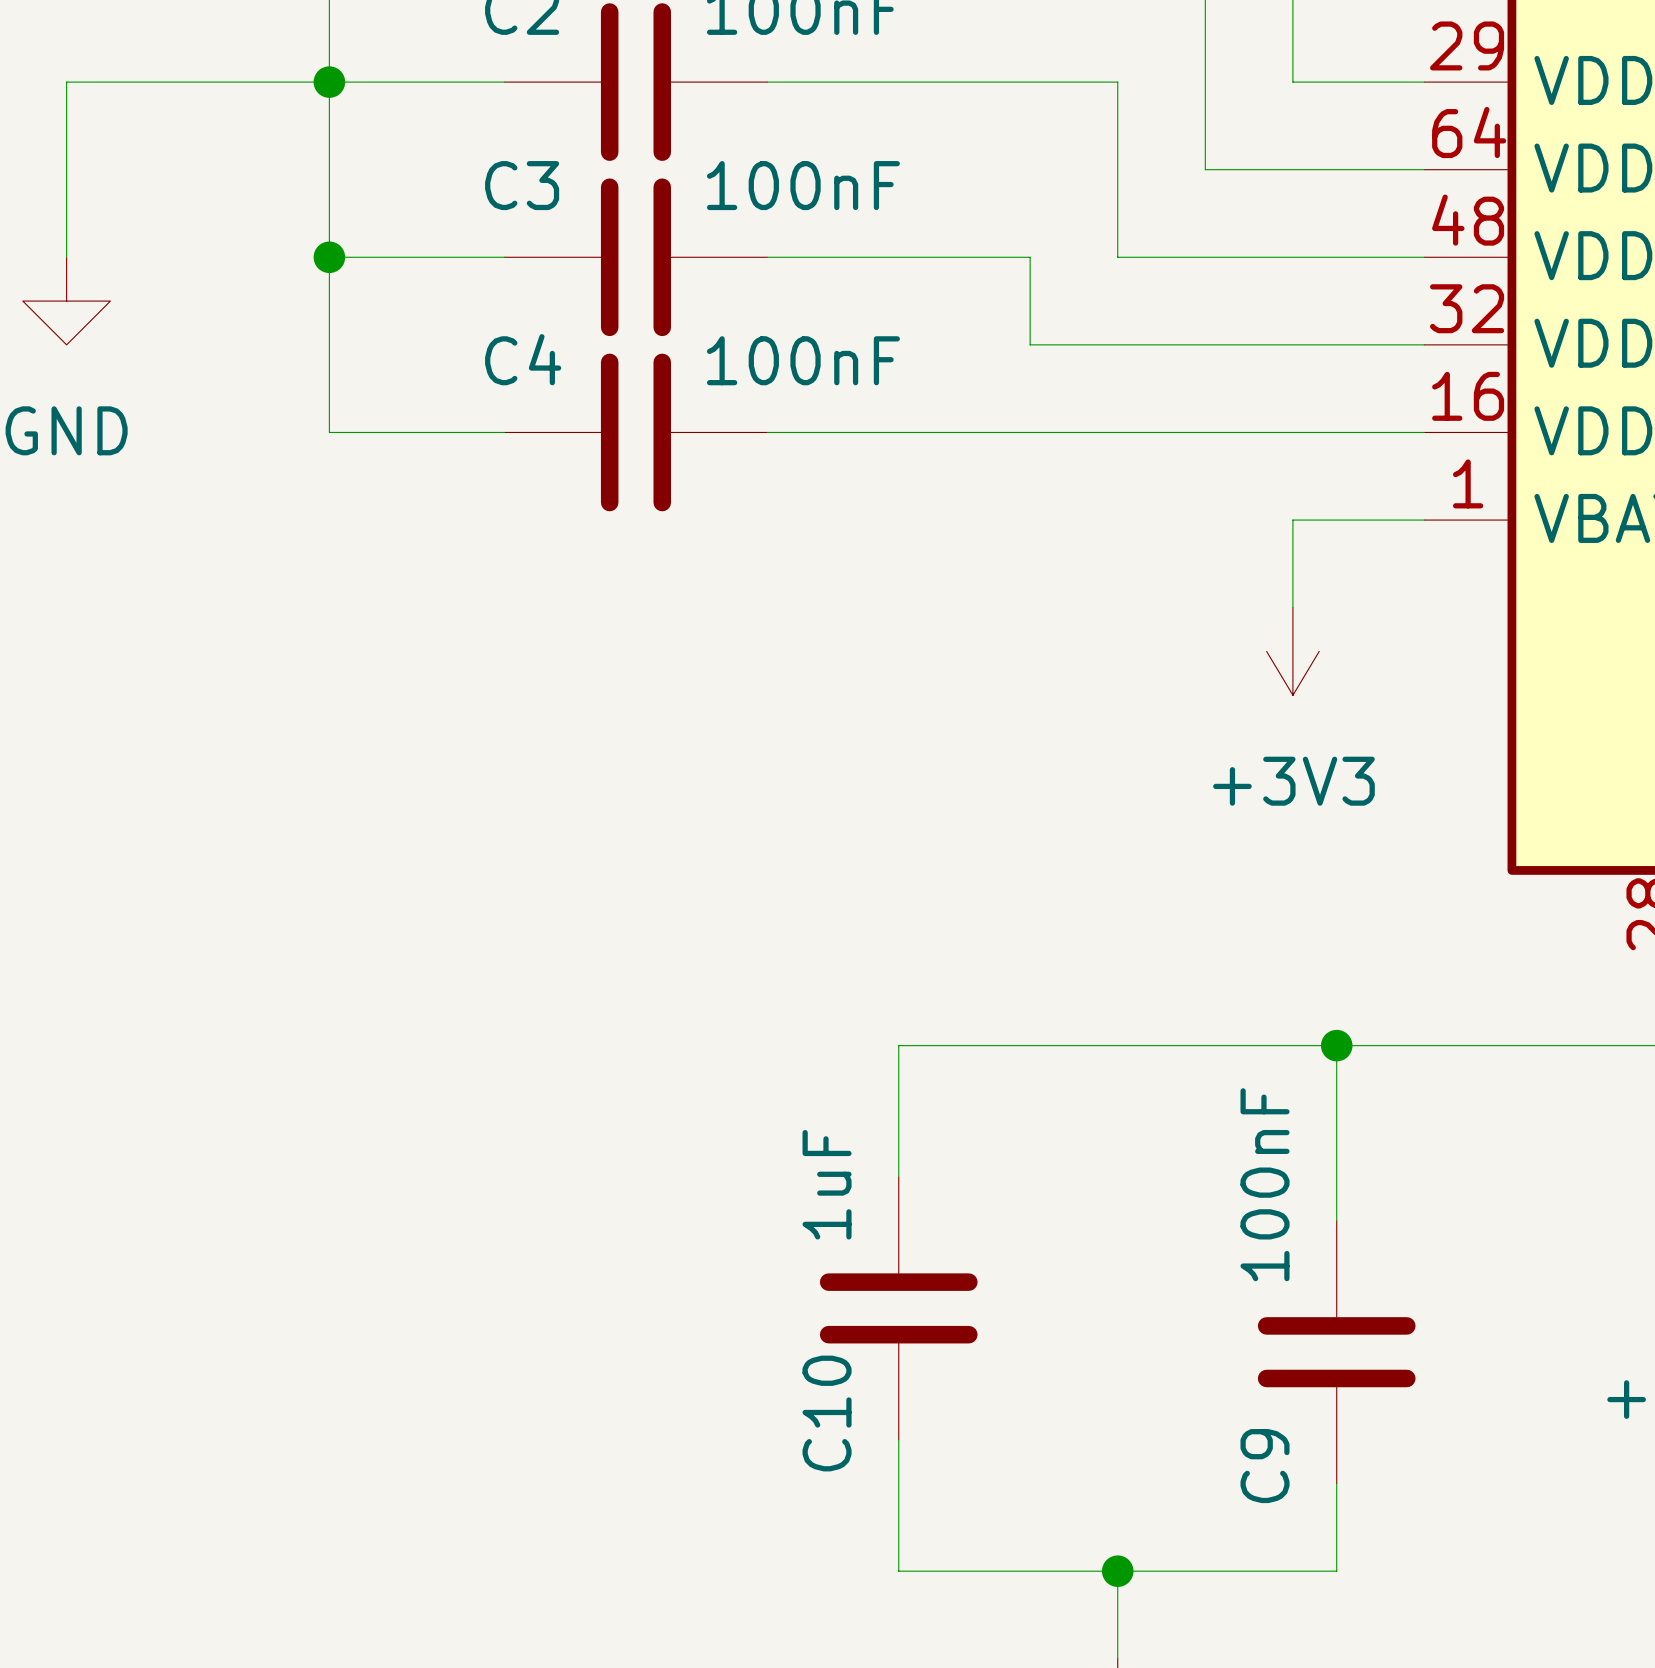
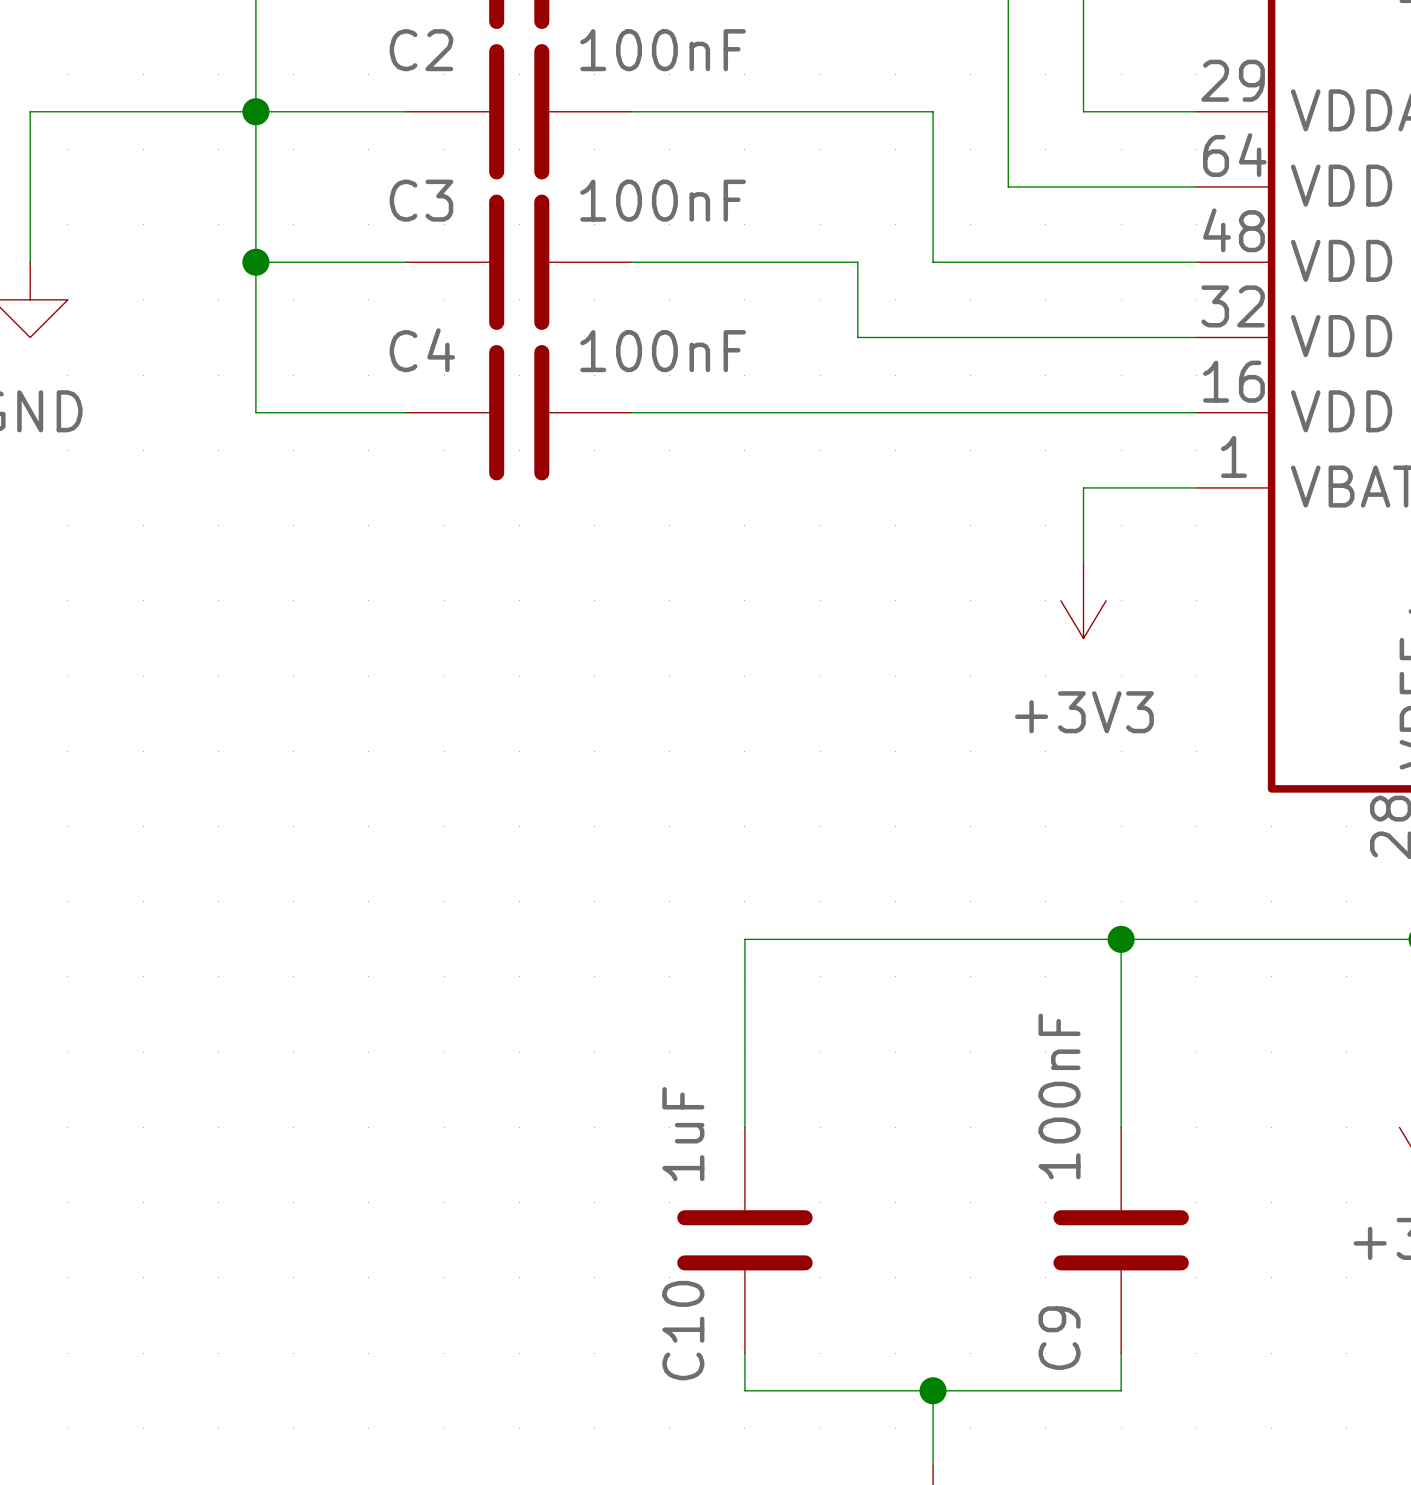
C10 position: (898, 1308) -> (744, 1240)
C9 position: (1336, 1352) -> (1121, 1240)

